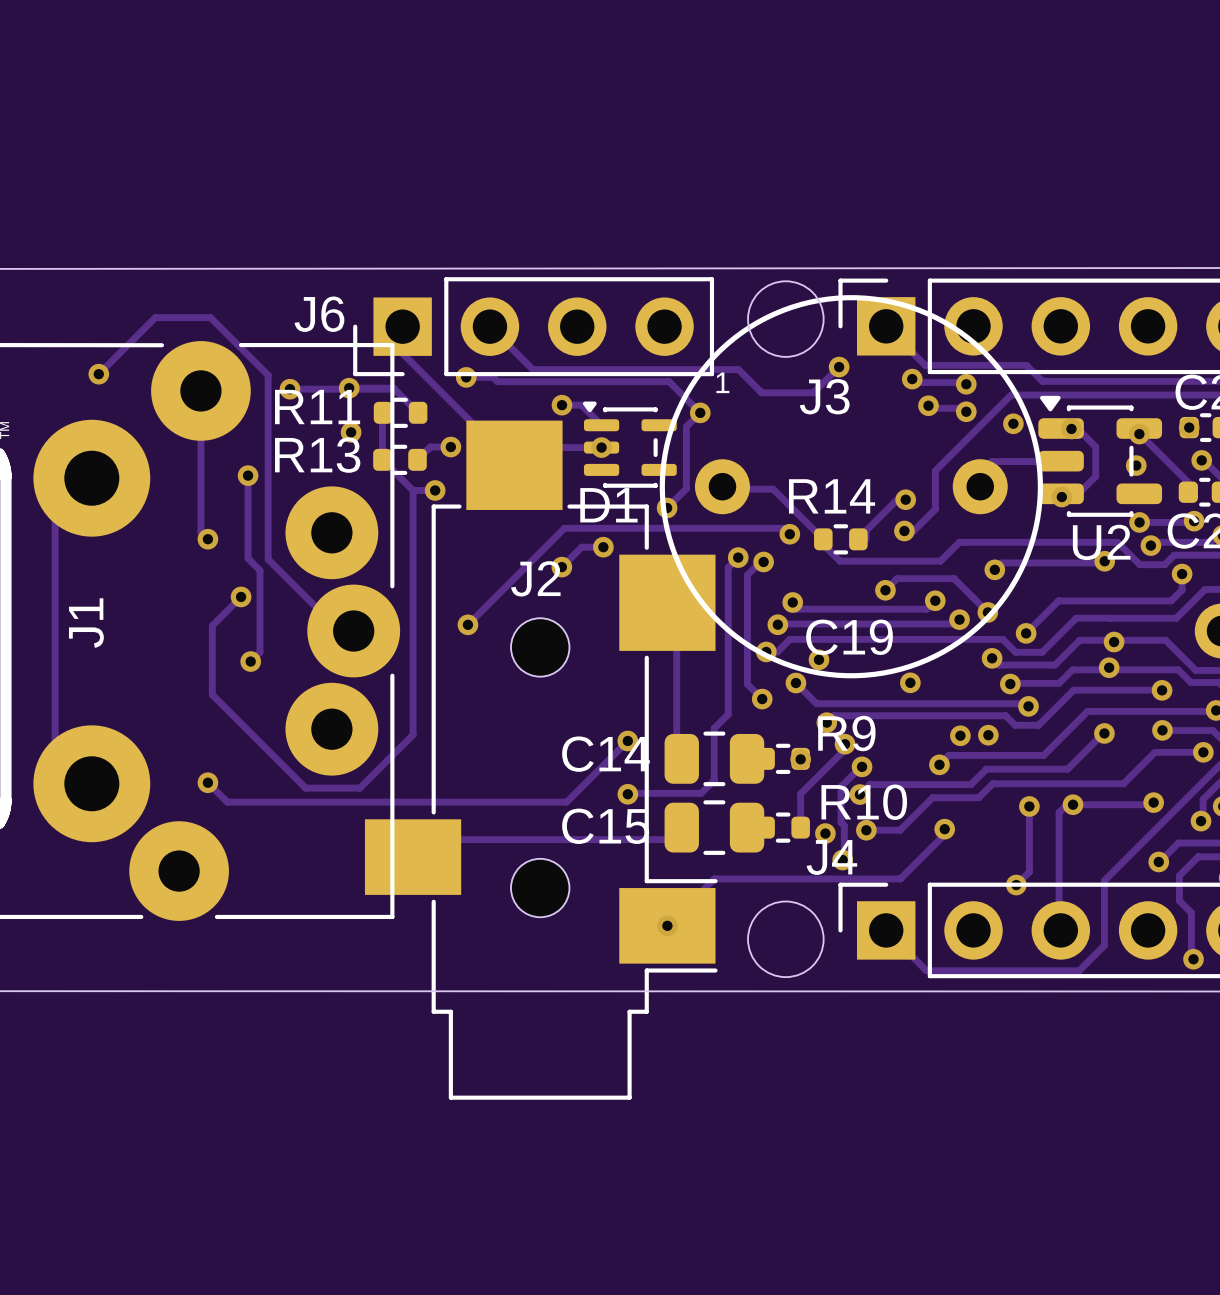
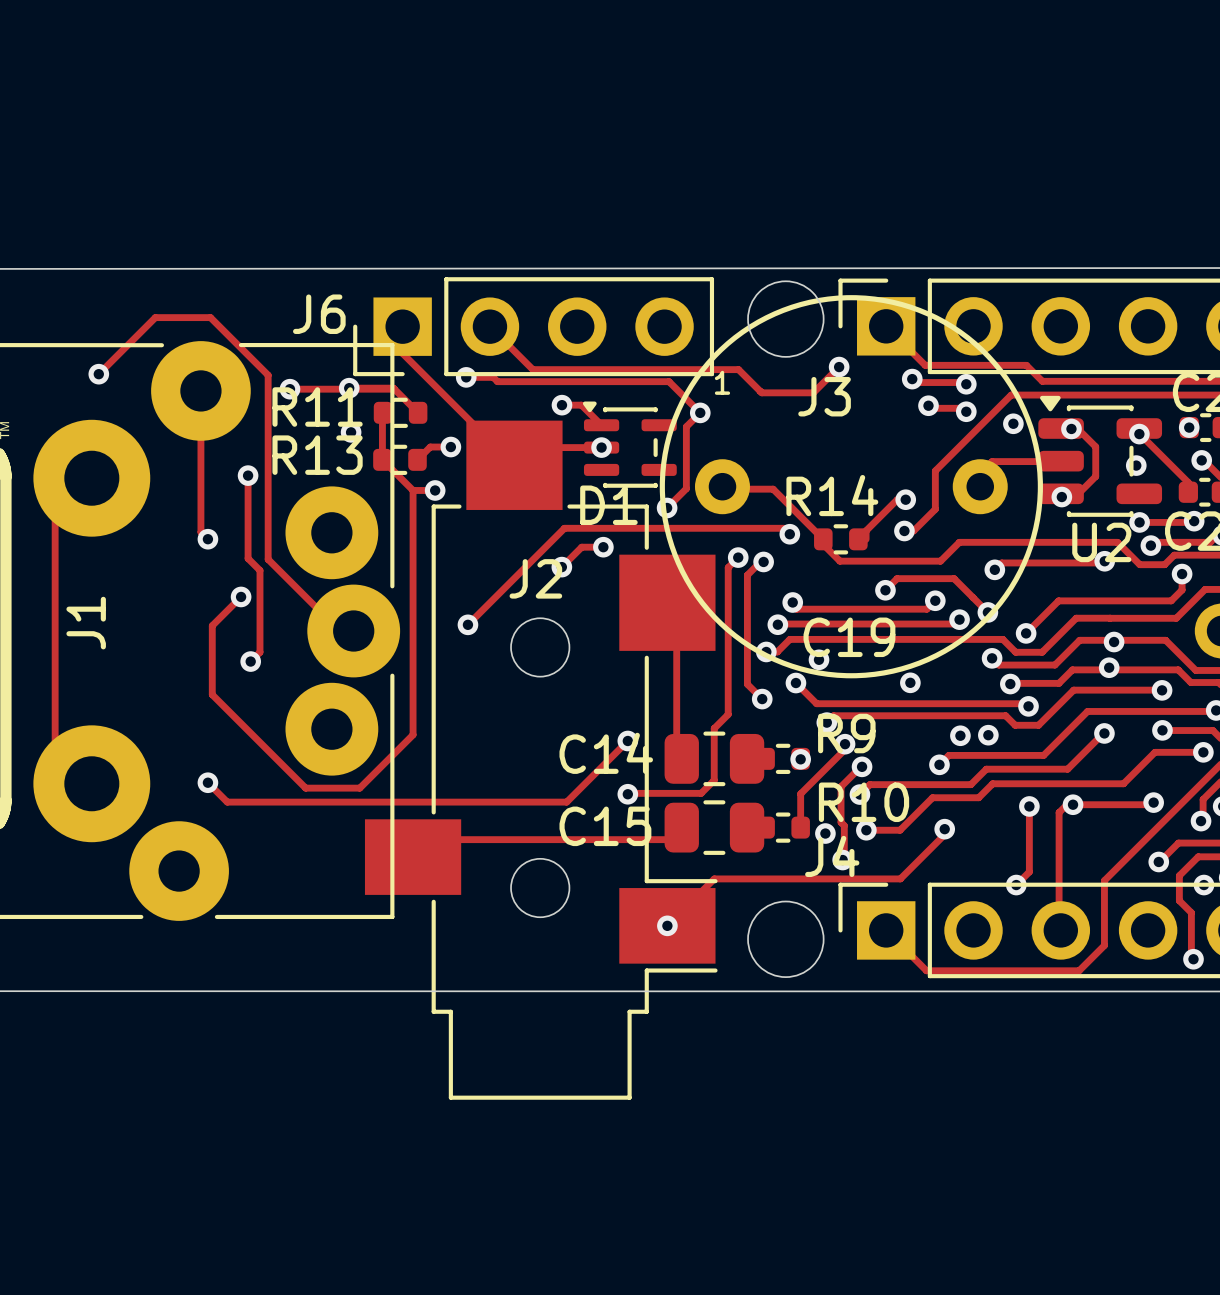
via: none -> (1203, 885)

